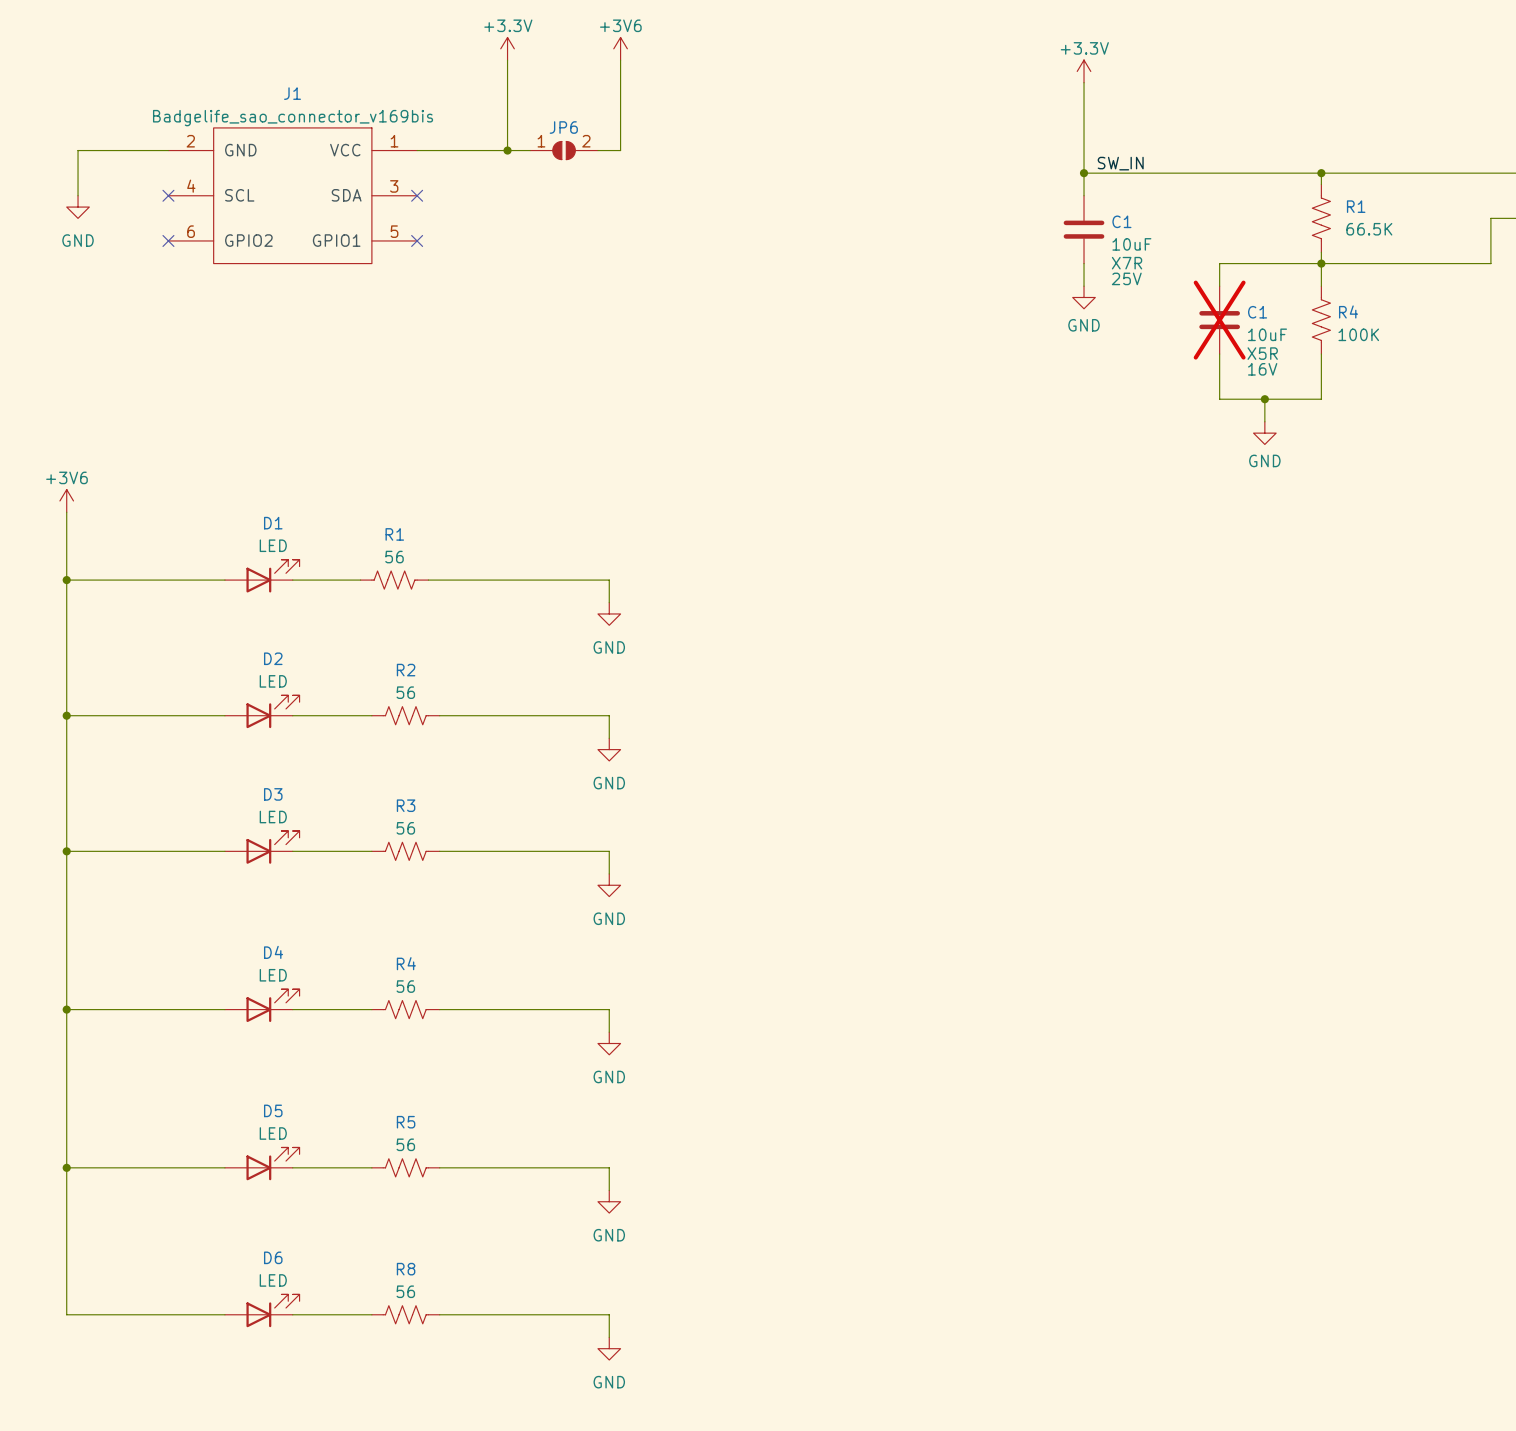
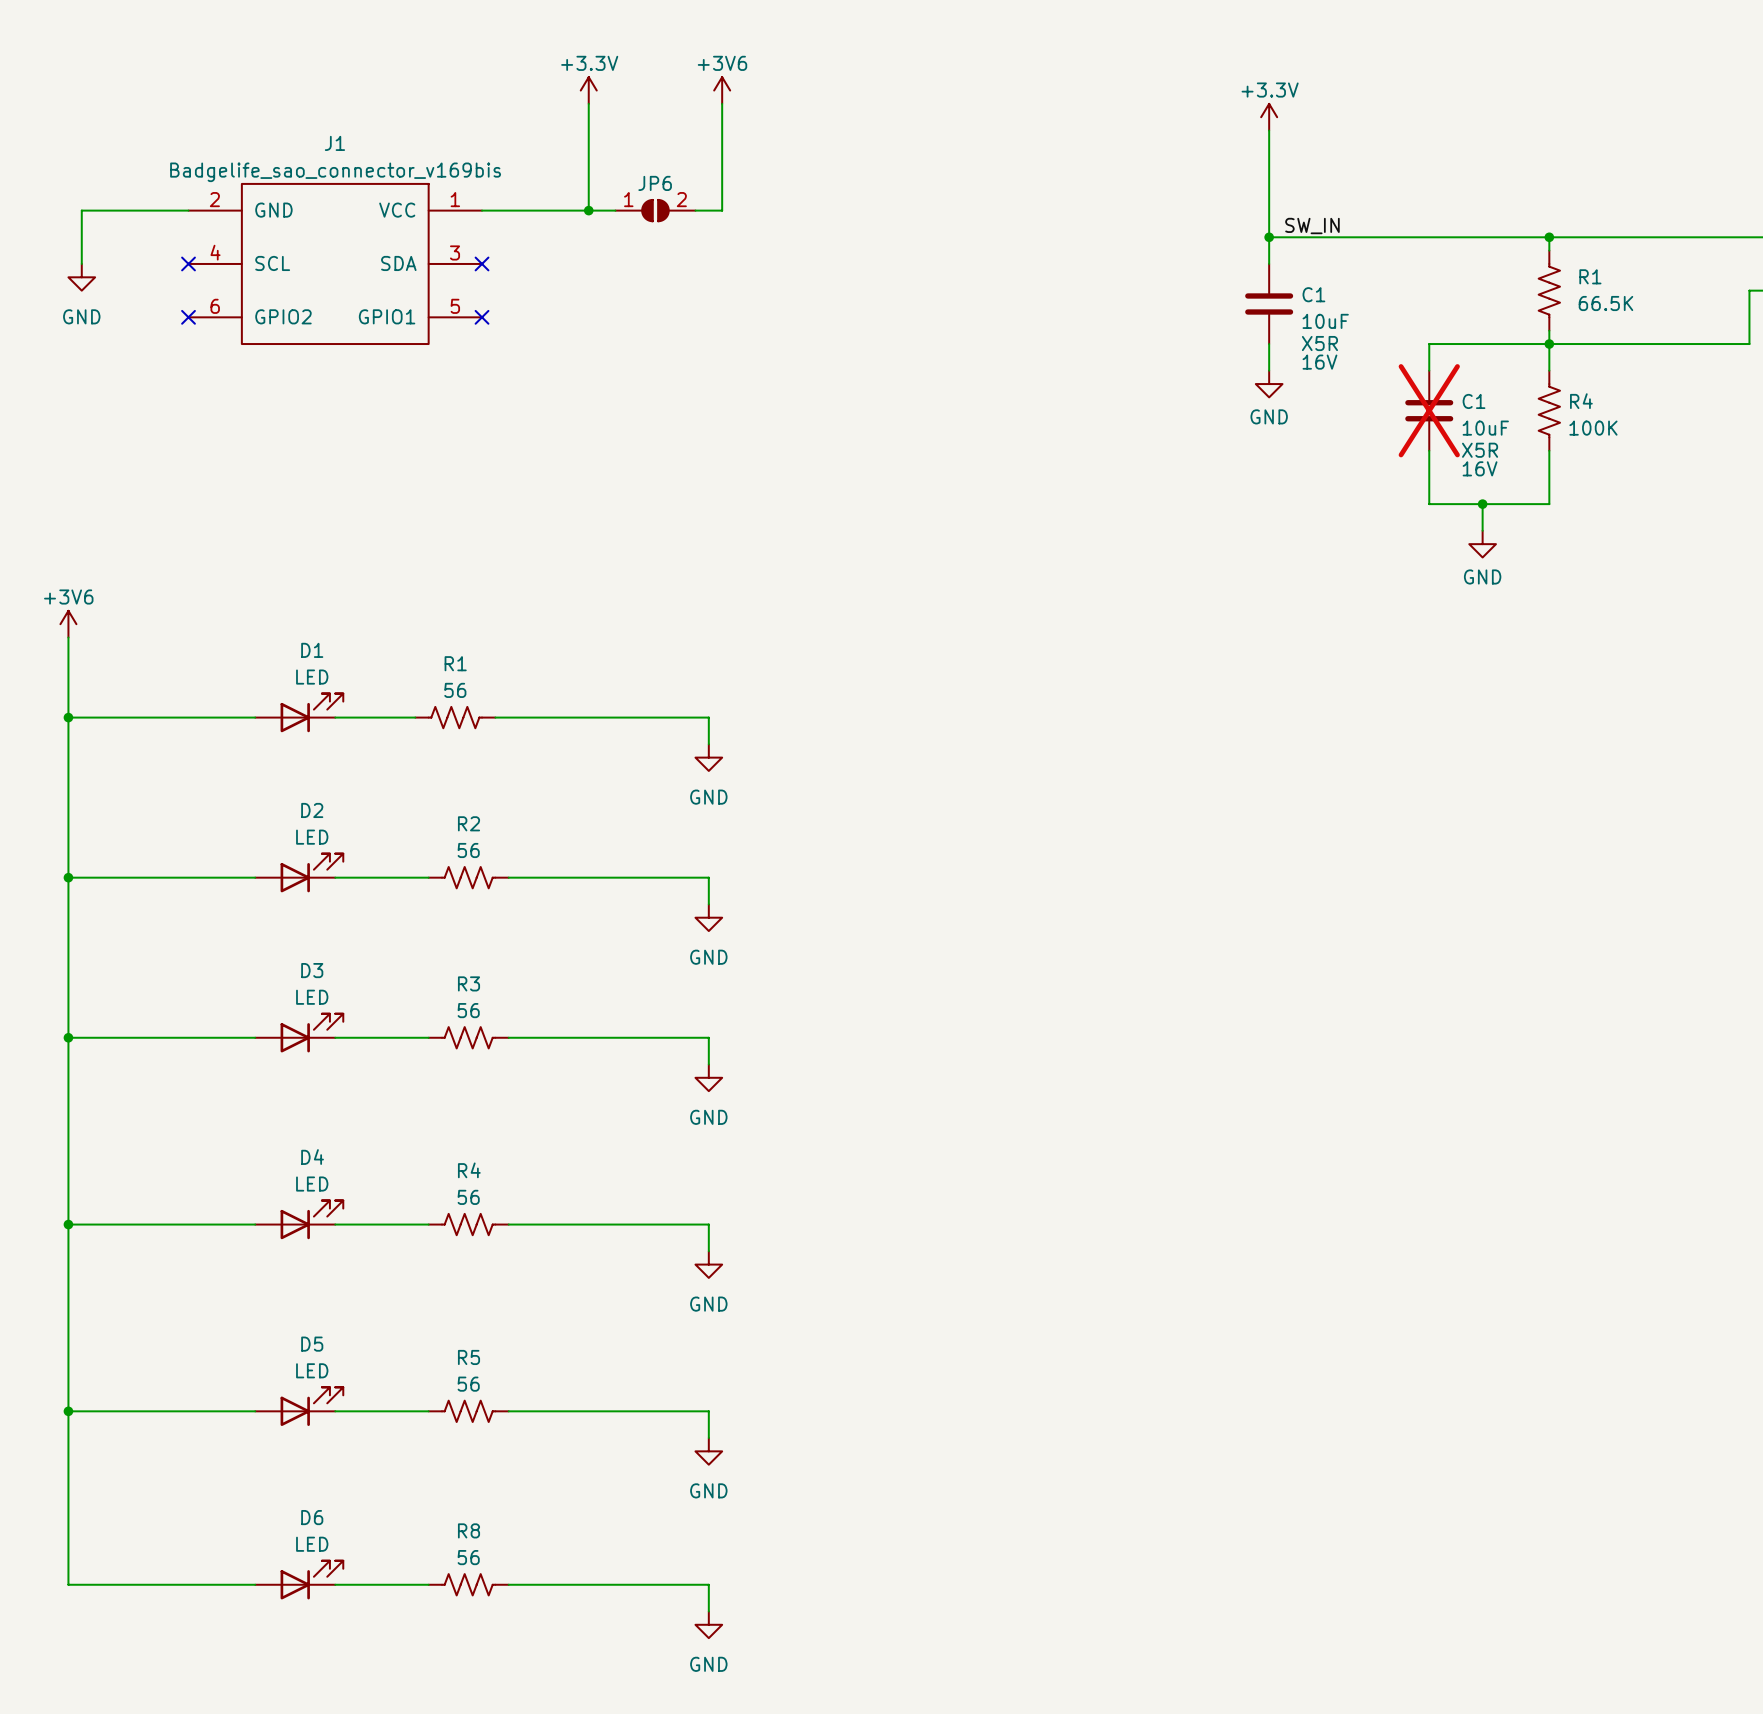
C1 text: X7R (1127, 263) -> X5R (1319, 343)
C1 text: 25V (1126, 278) -> 16V (1319, 362)

